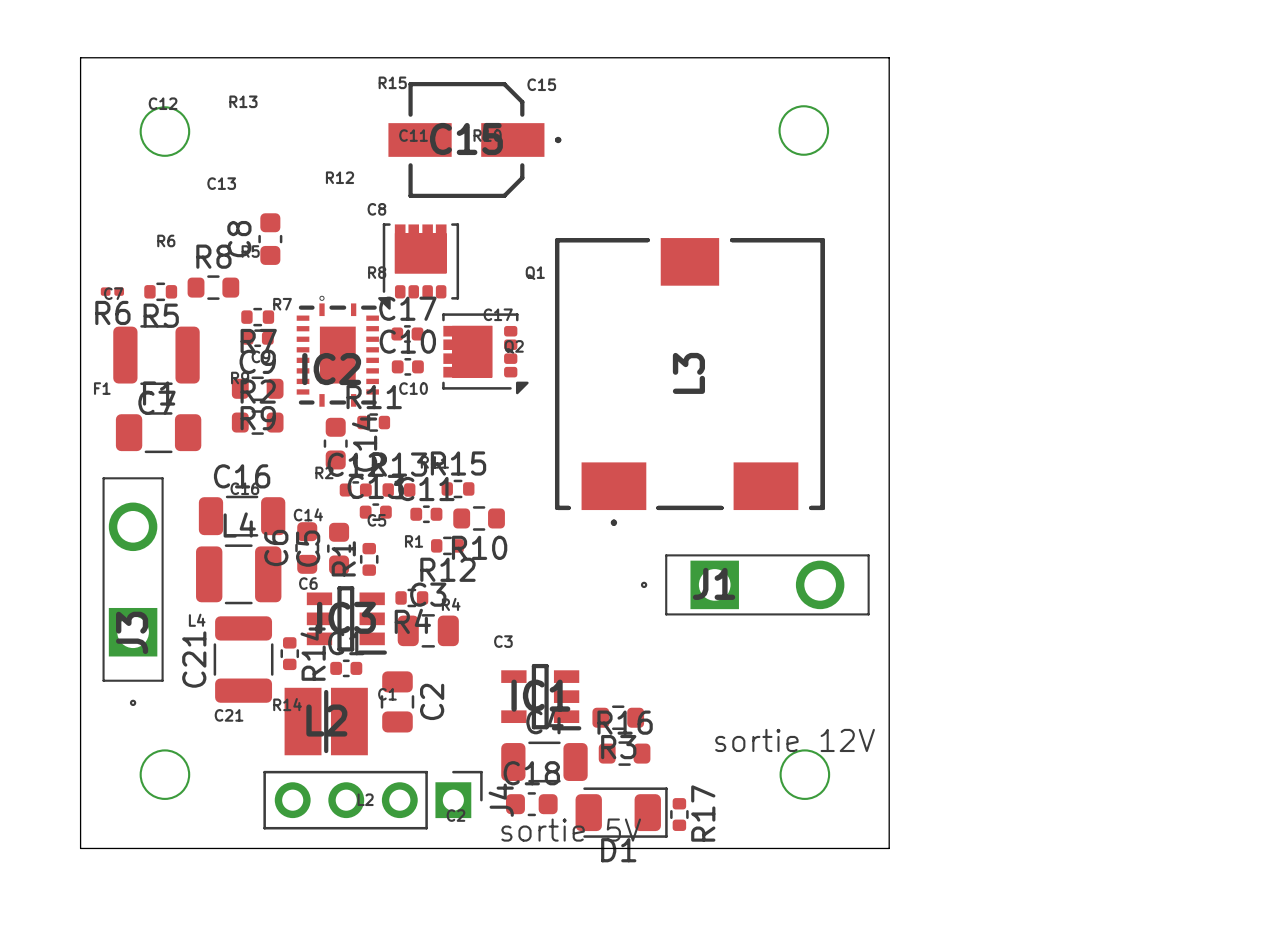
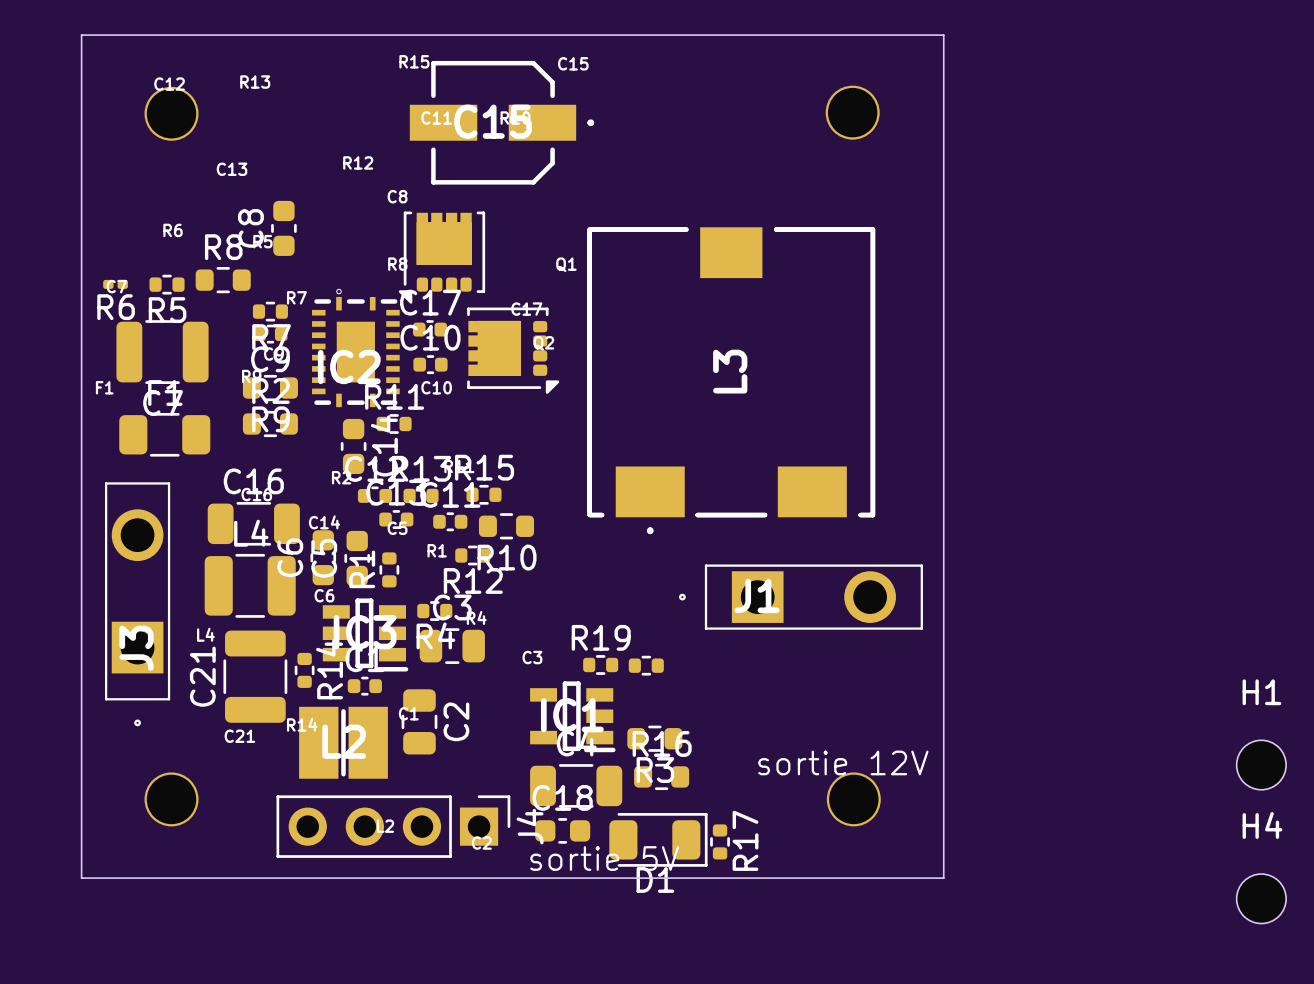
R19: none -> (600, 664)
part: none -> (646, 665)
H1: none -> (1261, 765)
H4: none -> (1261, 898)

